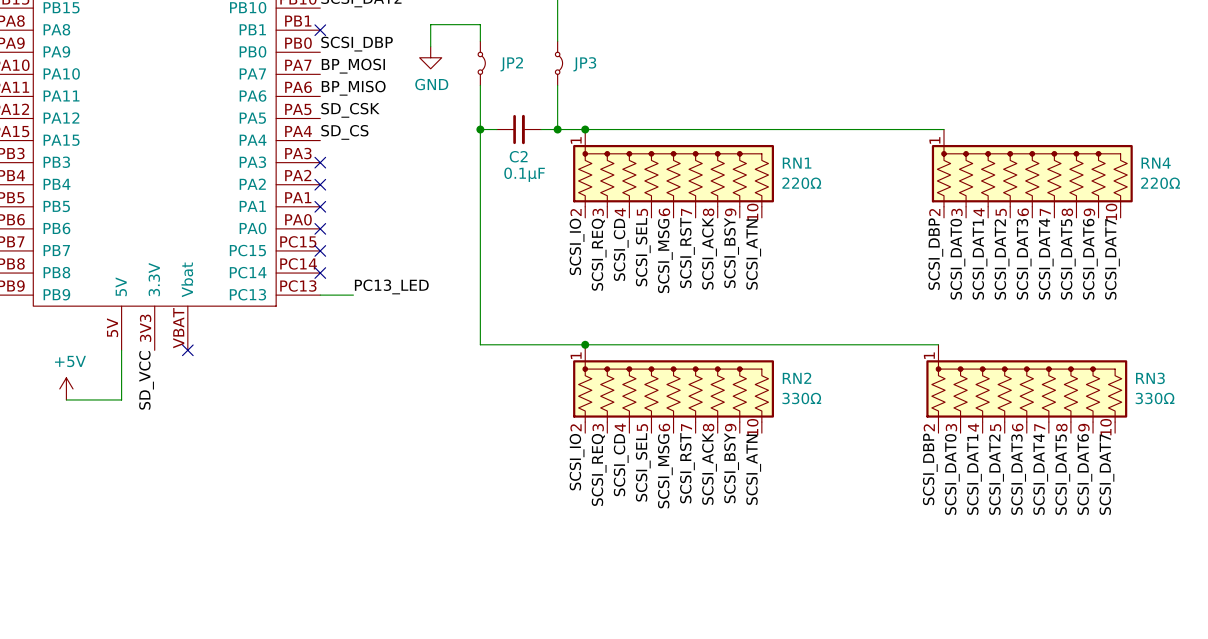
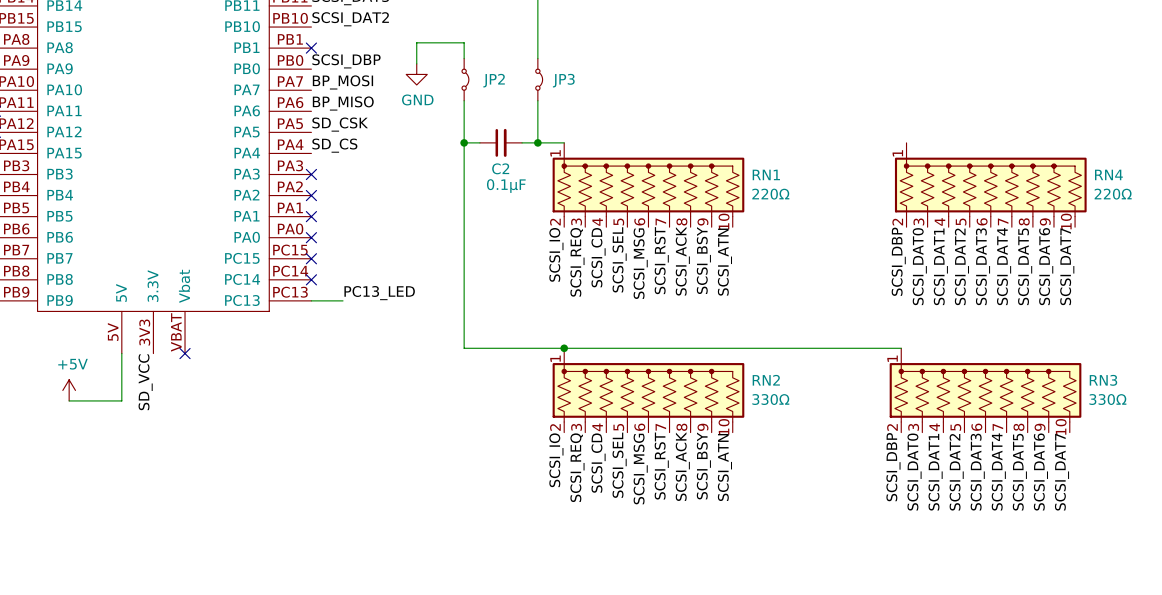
wire: (585, 129) (944, 129) -> none
junction: (585, 129) -> none

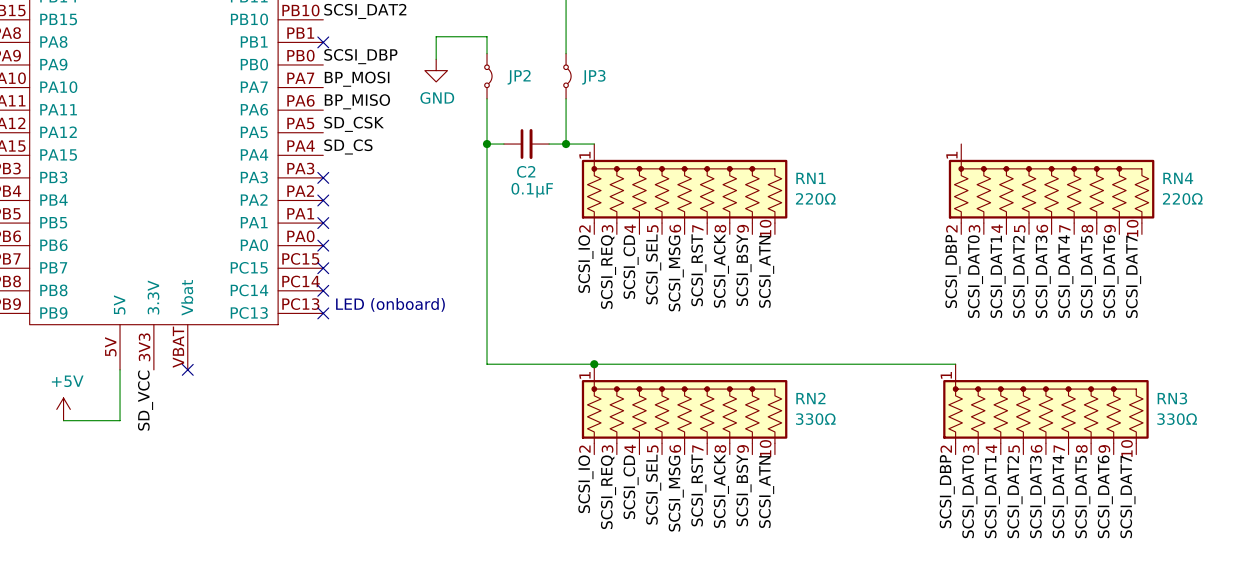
text: none -> LED (onboard) (390, 304)
label: PC13_LED (379, 293) -> none
wire: (311, 300) (343, 300) -> none
no-connect mark: none -> (323, 313)

